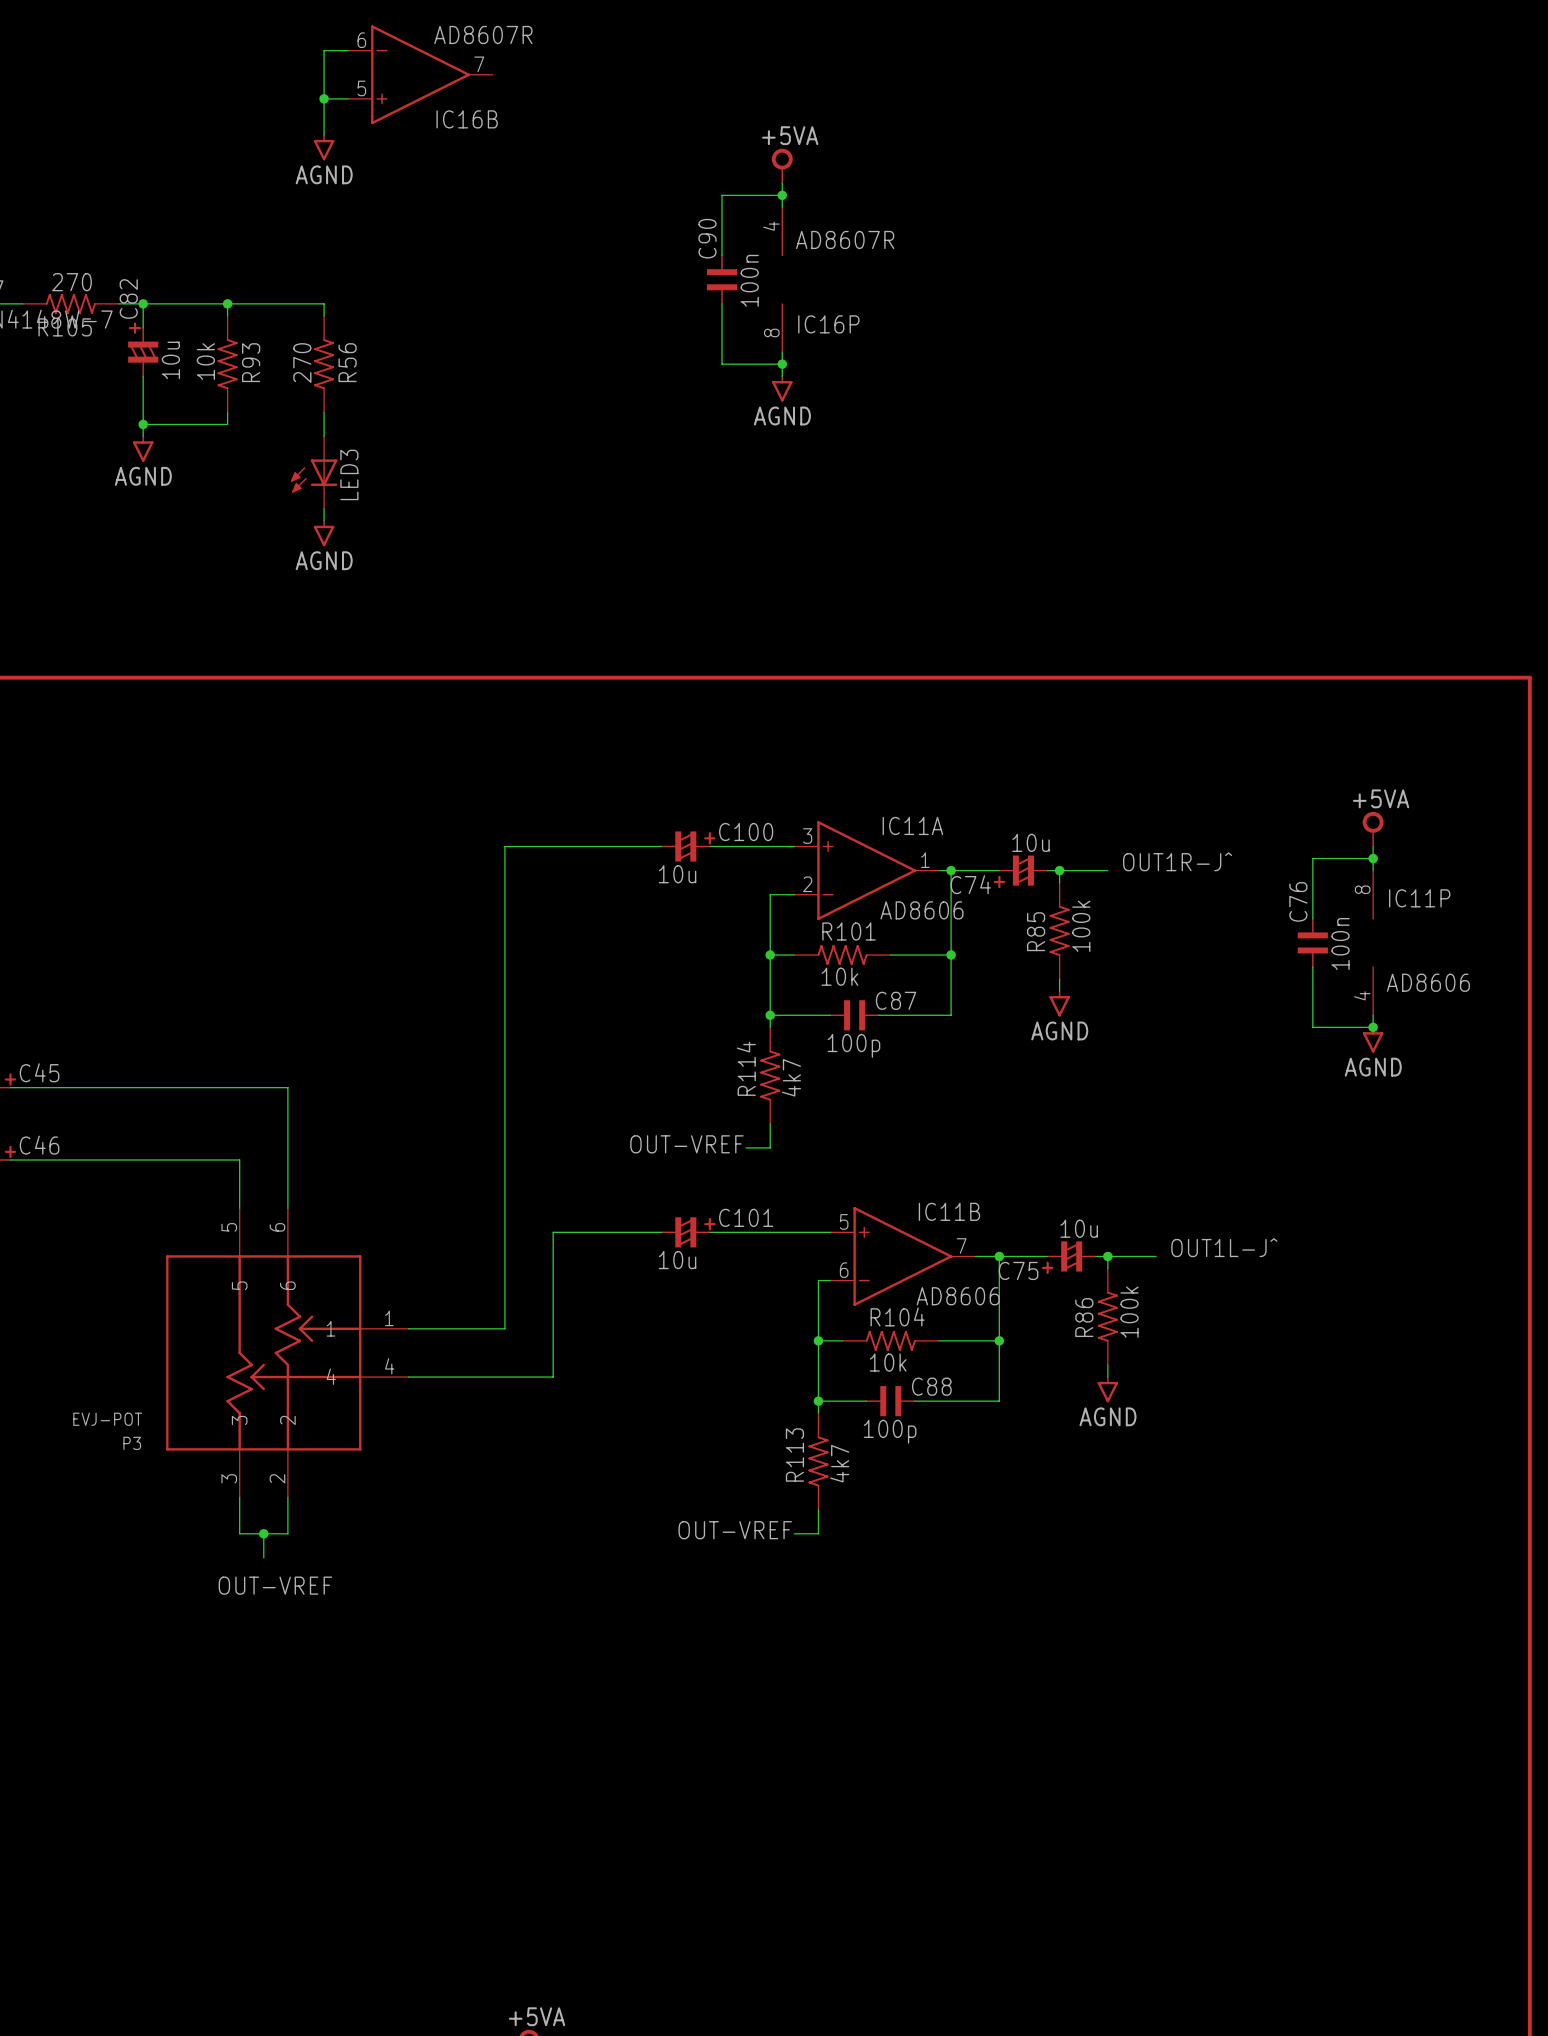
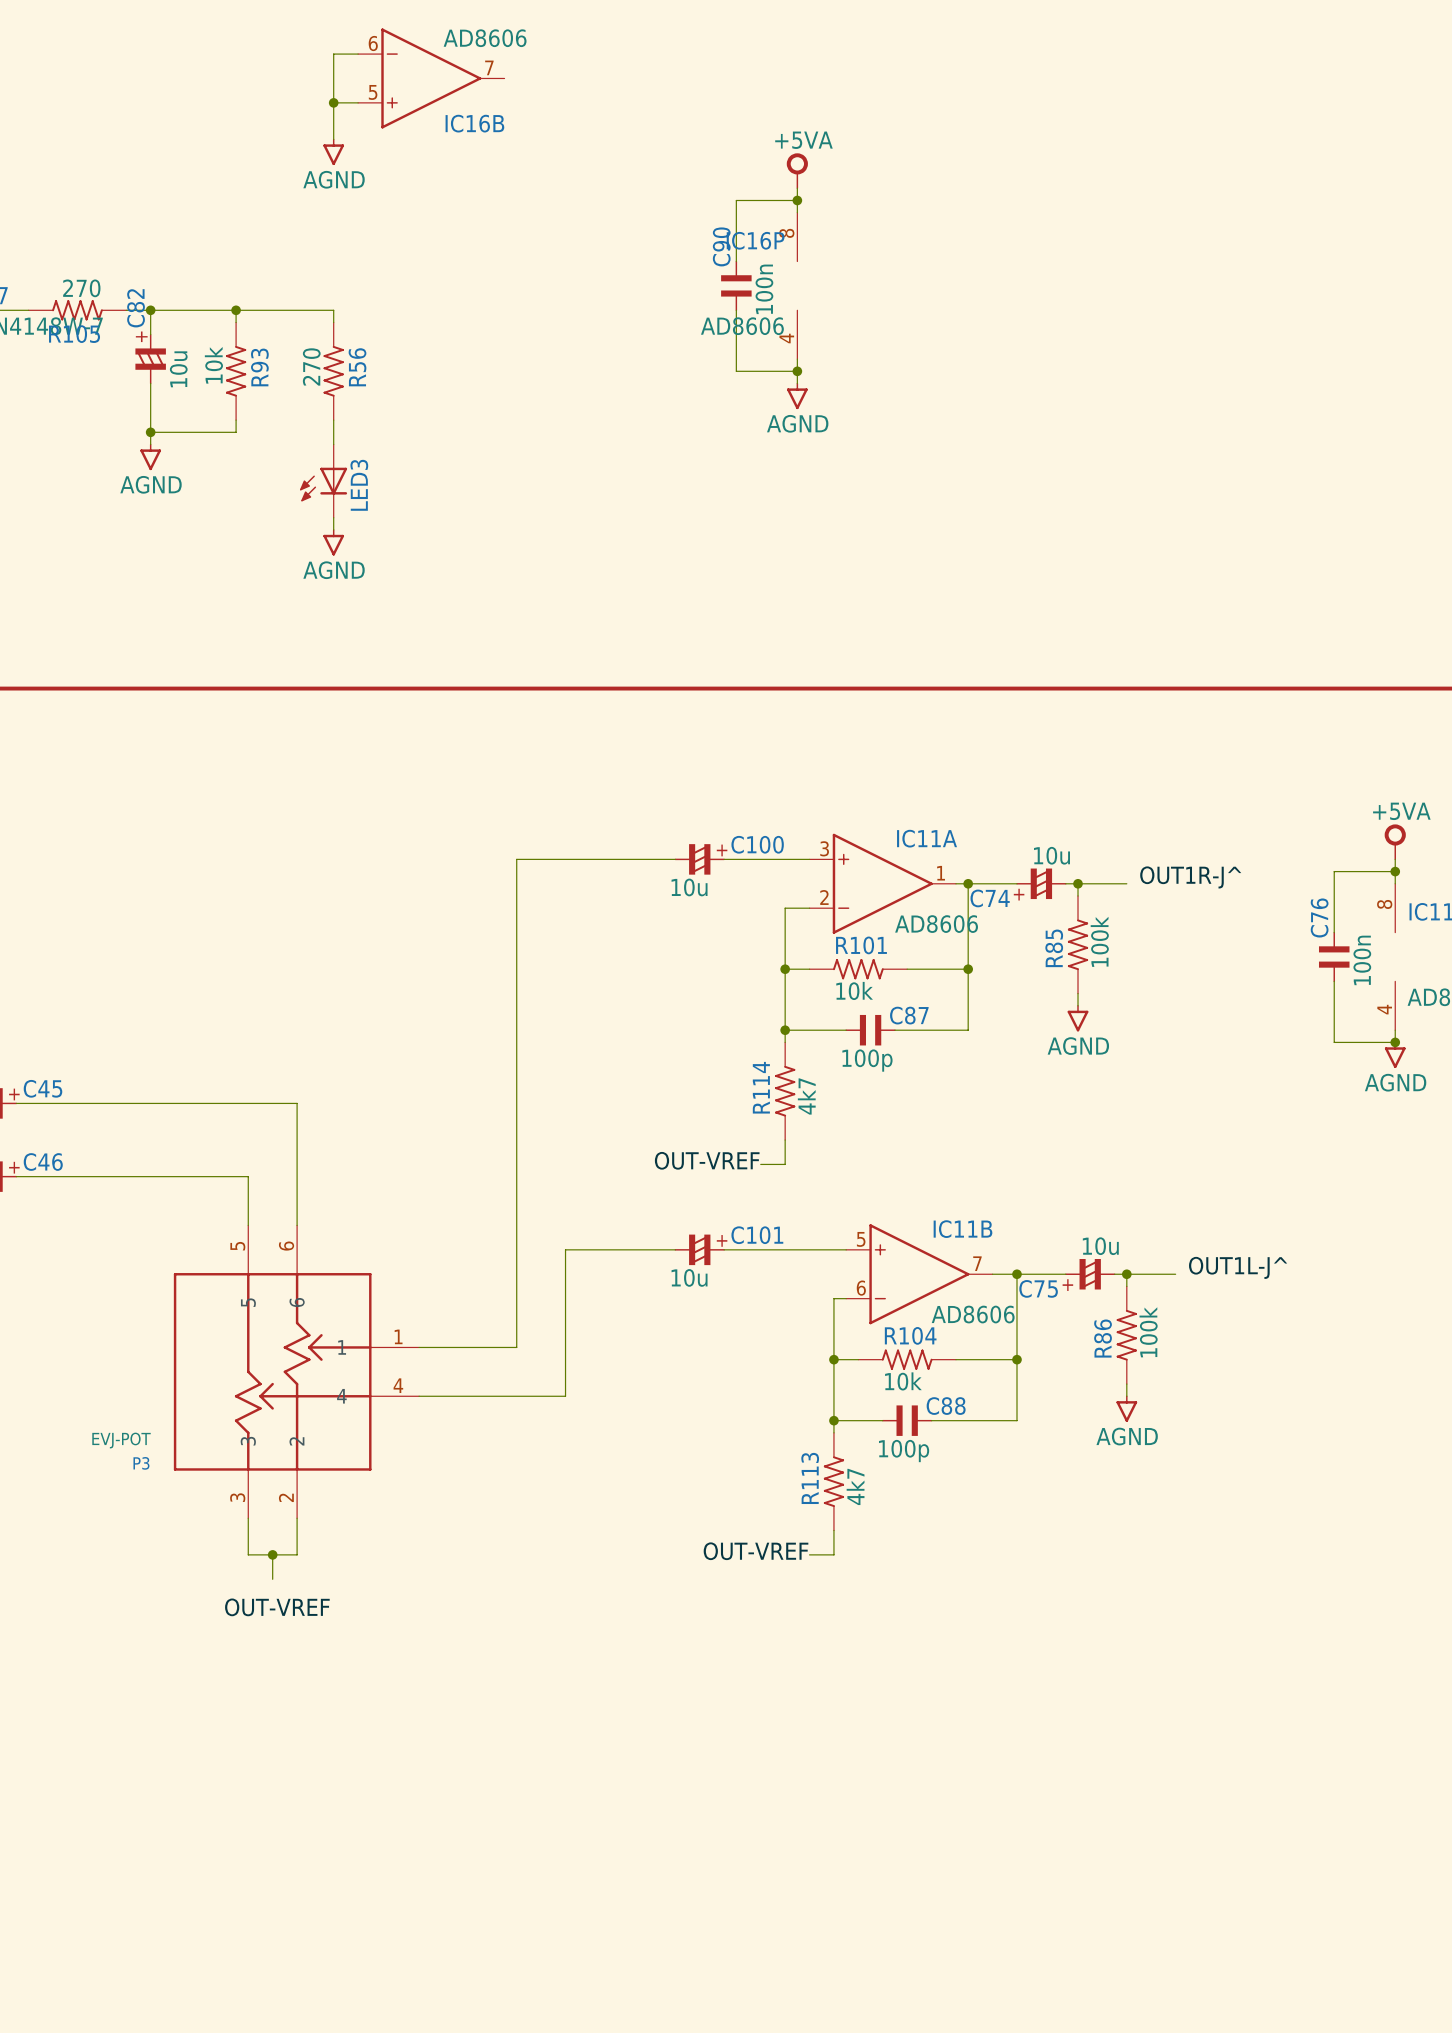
IC16B value: AD8607R (483, 34) -> AD8606 (485, 38)
IC16P value: AD8607R (845, 239) -> AD8606 (742, 326)
IC16P rotation: 0° (782, 279) -> 180° (797, 285)

